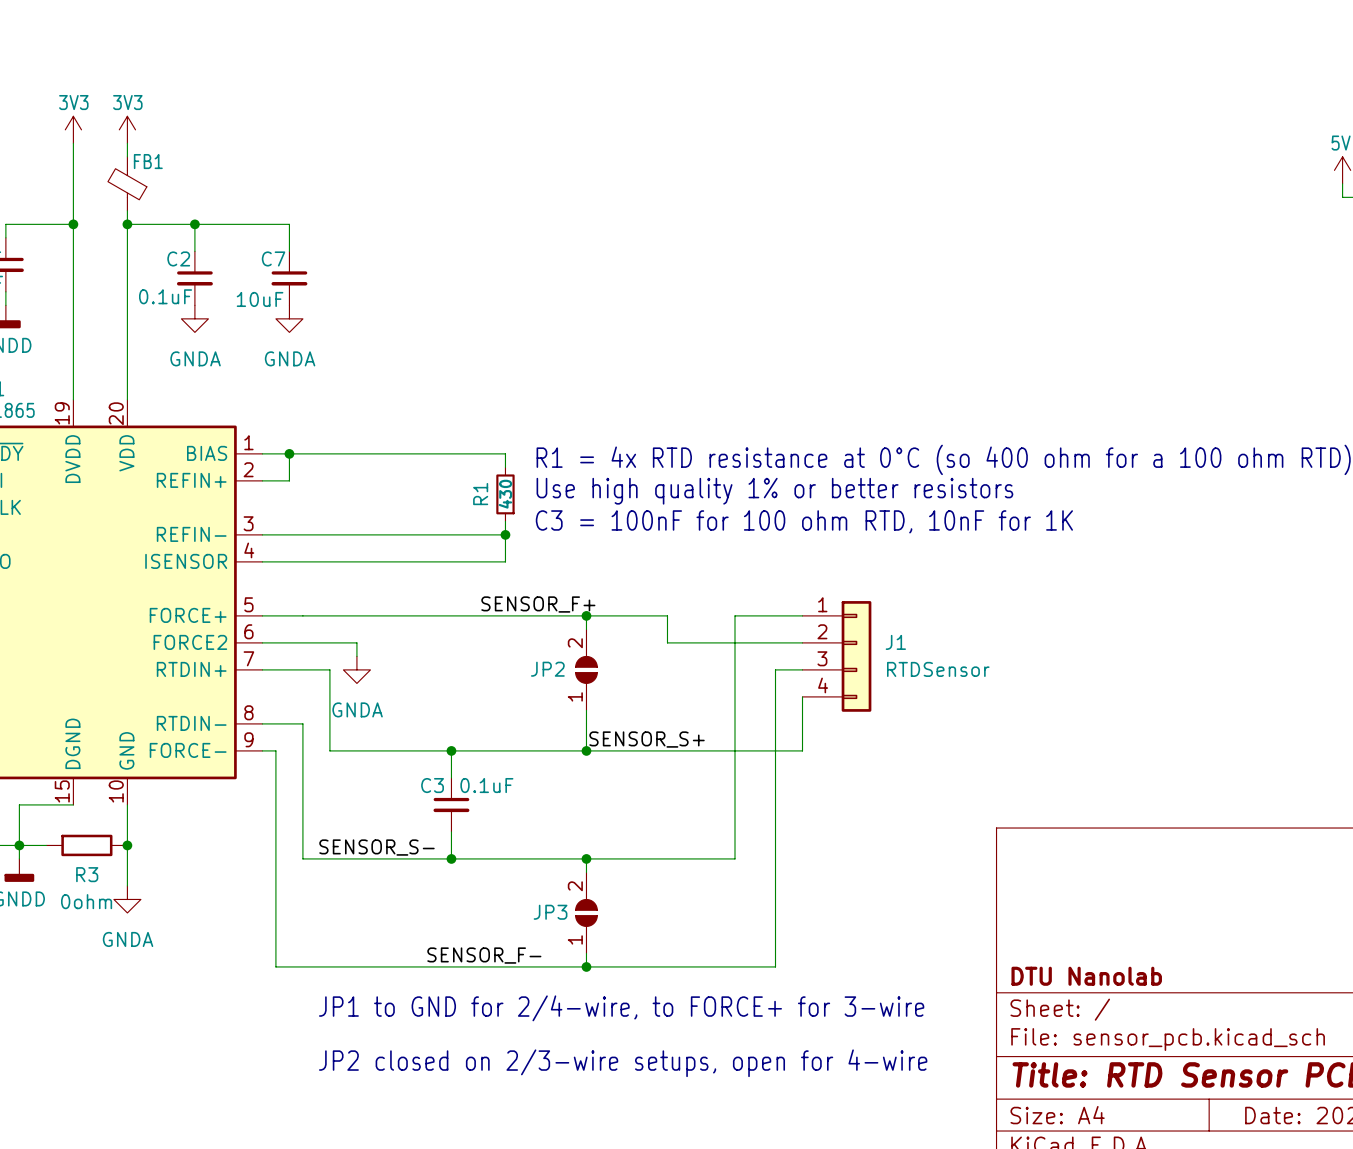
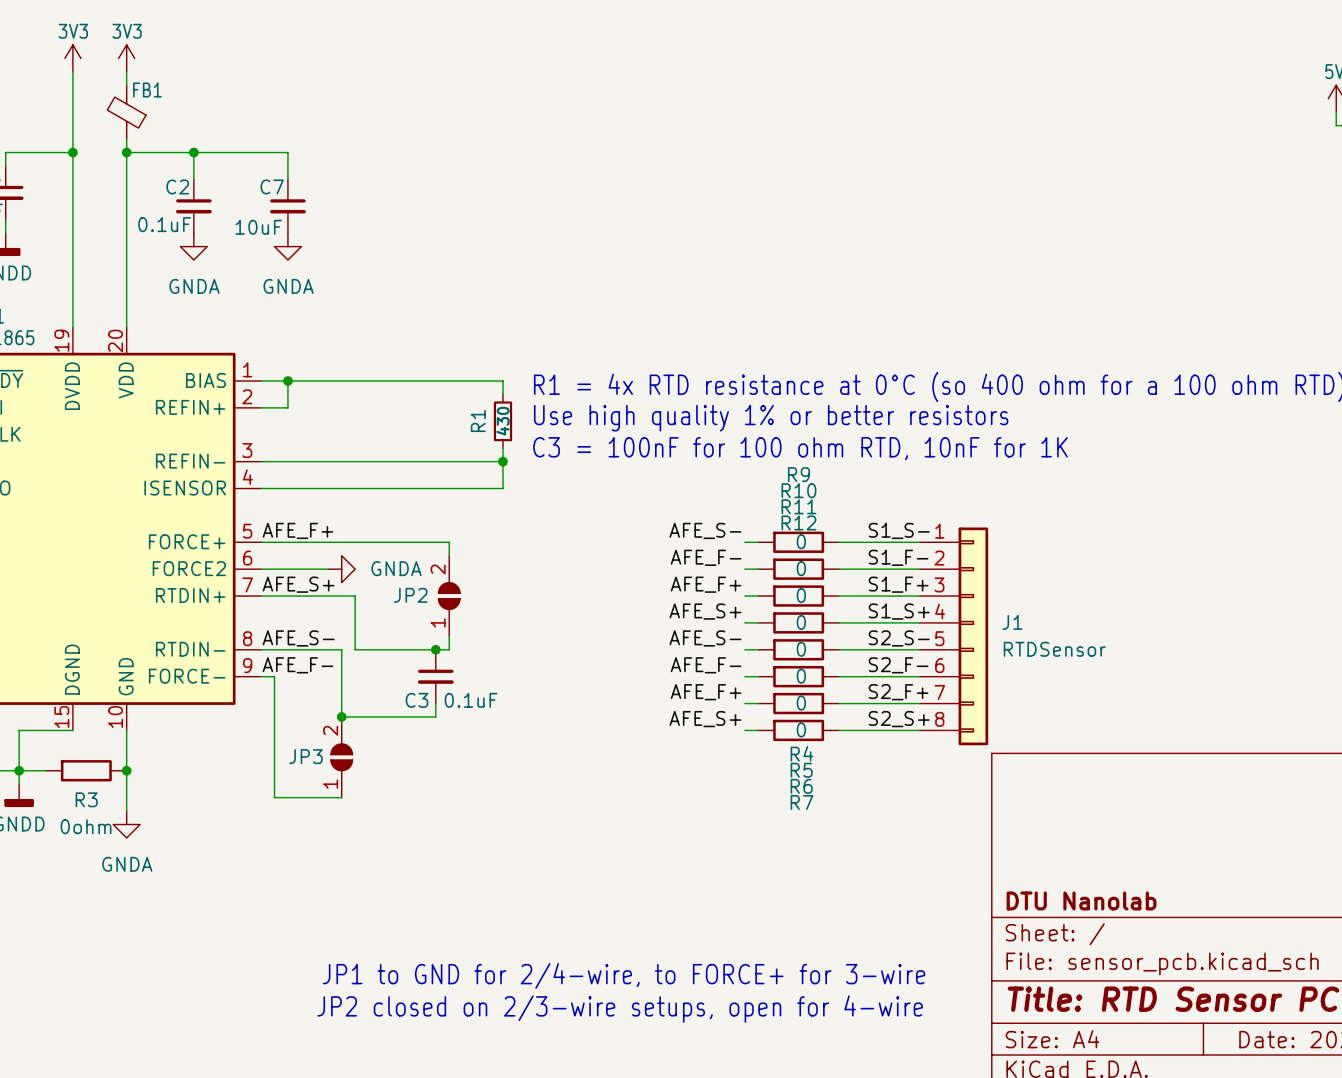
J1 symbol: [802, 601, 872, 712] -> [919, 527, 989, 746]
label: none -> AFE_F+ (297, 530)
label: SENSOR_F+ (538, 604) -> none
label: none -> AFE_S- (705, 530)
label: none -> S1_S- (899, 530)
wire: (451, 615) (667, 615) (667, 642) (748, 642) -> (449, 542) (449, 555)
wire: (586, 615) (586, 629) -> none
junction: (586, 615) -> none
wire: (748, 615) (734, 615) (734, 858) (302, 858) (302, 723) -> (435, 703) (435, 717) (341, 717) (341, 649) (301, 649)
wire: (762, 615) (802, 615) -> none
R9: none -> 0 (798, 542)
wire: none -> (838, 542) (919, 542)
label: none -> AFE_F- (706, 557)
label: none -> S1_F- (898, 557)
wire: (329, 642) (356, 642) (356, 656) -> none
wire: (762, 642) (802, 642) -> none
R10: none -> 0 (798, 569)
wire: none -> (838, 569) (919, 569)
label: none -> AFE_S+ (298, 584)
label: none -> AFE_F+ (706, 584)
label: none -> S1_F+ (898, 584)
wire: (329, 669) (329, 750) (748, 750) -> (328, 596) (355, 596) (355, 649) (449, 649) (449, 636)
power symbol rotation: 0° (356, 669) -> 90° counterclockwise (341, 569)
power symbol position: GNDA (356, 669) -> GNDA (341, 569)
JP2 position: (586, 669) -> (449, 596)
wire: none -> (744, 596) (758, 596)
wire: (802, 669) (775, 669) (775, 966) (275, 966) (275, 872) -> (341, 797) (274, 797)
R11: none -> 0 (798, 596)
wire: none -> (838, 596) (919, 596)
label: none -> AFE_S+ (705, 611)
label: none -> S1_S+ (899, 611)
wire: none -> (744, 622) (758, 622)
wire: (802, 696) (802, 750) (762, 750) -> none
R12: none -> 0 (798, 622)
wire: none -> (838, 622) (919, 622)
wire: (586, 710) (586, 750) -> none
label: none -> AFE_S- (298, 638)
label: none -> AFE_S- (705, 638)
label: none -> S2_S- (899, 638)
wire: none -> (744, 649) (758, 649)
R4: none -> 0 (798, 649)
wire: none -> (838, 649) (919, 649)
label: none -> AFE_F- (297, 665)
label: SENSOR_S+ (647, 739) -> none
label: none -> AFE_F- (706, 665)
label: none -> S2_F- (898, 665)
wire: (451, 750) (451, 777) -> none
junction position: (451, 750) -> (435, 649)
junction: (586, 750) -> none
R5: none -> 0 (798, 676)
wire: none -> (838, 676) (919, 676)
label: none -> AFE_F+ (706, 692)
label: none -> S2_F+ (898, 692)
wire: none -> (744, 703) (758, 703)
R6: none -> 0 (798, 703)
wire: none -> (838, 703) (919, 703)
C3 name position: C3 (432, 785) -> C3 (416, 700)
C3 value position: 0.1uF (486, 785) -> 0.1uF (471, 700)
junction: none -> (341, 717)
label: none -> AFE_S+ (705, 719)
label: none -> S2_S+ (899, 719)
C3 position: (451, 804) -> (435, 676)
wire: none -> (744, 730) (758, 730)
R7: none -> 0 (798, 730)
wire: none -> (838, 730) (919, 730)
wire: (451, 831) (451, 858) -> none
label: SENSOR_S- (376, 847) -> none
junction: (451, 858) -> none
wire: (586, 858) (586, 872) -> none
junction: (586, 858) -> none
JP3 position: (586, 912) -> (341, 757)
wire: (586, 953) (586, 966) -> none
label: SENSOR_F- (484, 955) -> none
junction: (586, 966) -> none
text position: JP1 to GND for 2/4-wire, to FORCE+ for 3-wire (621, 1008) -> JP1 to GND for 2/4-wire, to FORCE+ for 3-wire (623, 975)
text position: JP2 closed on 2/3-wire setups, open for 4-wire (623, 1063) -> JP2 closed on 2/3-wire setups, open for 4-wire (620, 1009)

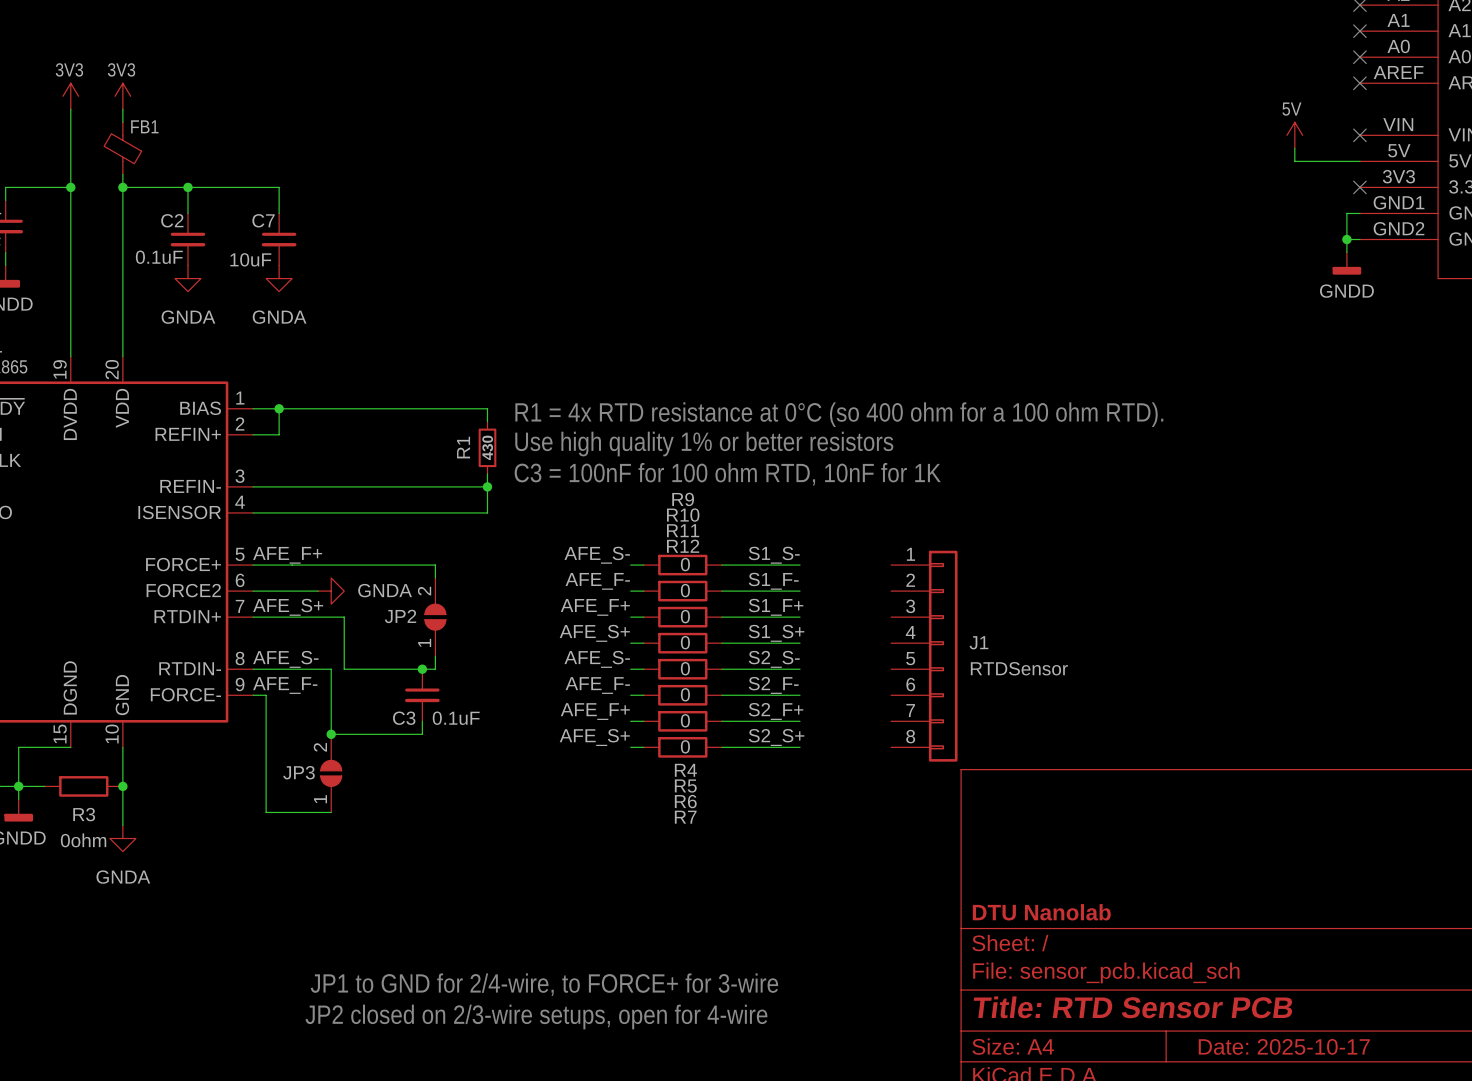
label: none -> AFE_S- (597, 555)
label: AFE_S- (705, 530) -> none
label position: S1_S- (899, 530) -> S1_S- (774, 555)
wire: none -> (630, 565) (643, 565)
wire: none -> (734, 565) (800, 565)
R9 position: (798, 542) -> (682, 565)
wire: (838, 542) (919, 542) -> none
label: none -> AFE_F- (597, 581)
label: AFE_F- (706, 557) -> none
label position: S1_F- (898, 557) -> S1_F- (773, 581)
wire: none -> (630, 591) (643, 591)
wire: none -> (734, 591) (800, 591)
R10 position: (798, 569) -> (682, 591)
wire: (838, 569) (919, 569) -> none
label: none -> AFE_F+ (595, 607)
label: AFE_F+ (706, 584) -> none
label position: S1_F+ (898, 584) -> S1_F+ (776, 607)
wire: none -> (630, 617) (643, 617)
wire: none -> (734, 617) (800, 617)
R11 position: (798, 596) -> (682, 617)
wire: (838, 596) (919, 596) -> none
label: none -> AFE_S+ (594, 633)
label: AFE_S+ (705, 611) -> none
label position: S1_S+ (899, 611) -> S1_S+ (776, 633)
wire: none -> (630, 643) (643, 643)
wire: none -> (734, 643) (800, 643)
R12 position: (798, 622) -> (682, 643)
wire: (838, 622) (919, 622) -> none
label: none -> AFE_S- (597, 659)
label: AFE_S- (705, 638) -> none
label position: S2_S- (899, 638) -> S2_S- (774, 659)
wire: none -> (630, 669) (643, 669)
wire: none -> (734, 669) (800, 669)
R4 position: (798, 649) -> (682, 669)
wire: (838, 649) (919, 649) -> none
label: none -> AFE_F- (597, 685)
label: AFE_F- (706, 665) -> none
label position: S2_F- (898, 665) -> S2_F- (773, 685)
wire: none -> (630, 695) (643, 695)
wire: none -> (734, 695) (800, 695)
R5 position: (798, 676) -> (682, 695)
wire: (838, 676) (919, 676) -> none
label: none -> AFE_F+ (595, 711)
label: AFE_F+ (706, 692) -> none
label position: S2_F+ (898, 692) -> S2_F+ (776, 711)
wire: none -> (630, 721) (643, 721)
wire: none -> (734, 721) (800, 721)
R6 position: (798, 703) -> (682, 721)
wire: (838, 703) (919, 703) -> none
label: none -> AFE_S+ (594, 737)
label: AFE_S+ (705, 719) -> none
label position: S2_S+ (899, 719) -> S2_S+ (776, 737)
wire: none -> (630, 747) (643, 747)
wire: none -> (734, 747) (800, 747)
R7 position: (798, 730) -> (682, 747)
wire: (838, 730) (919, 730) -> none

